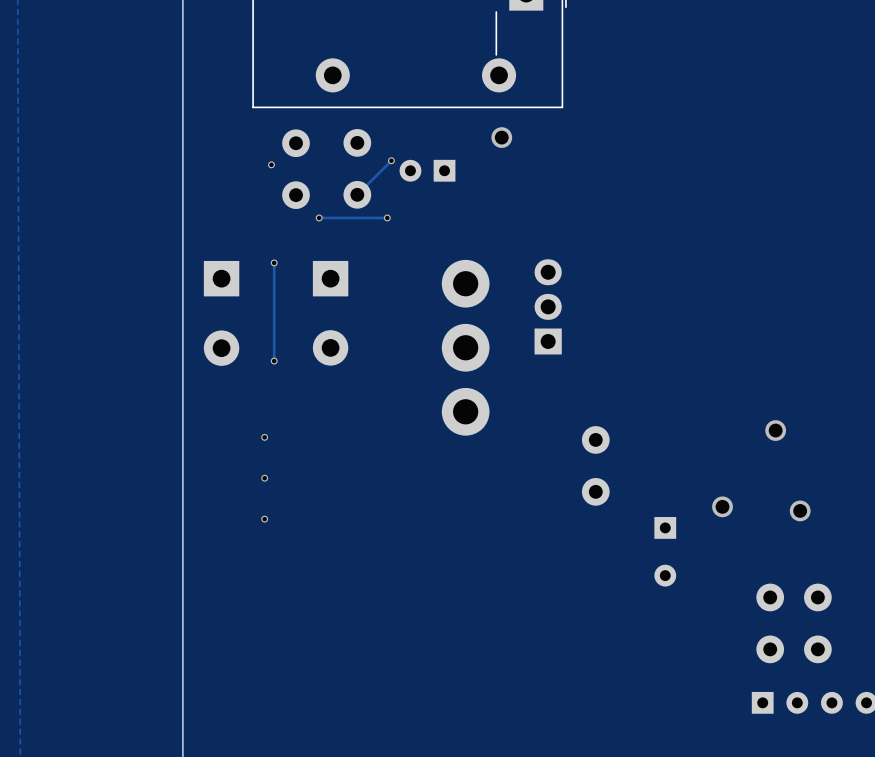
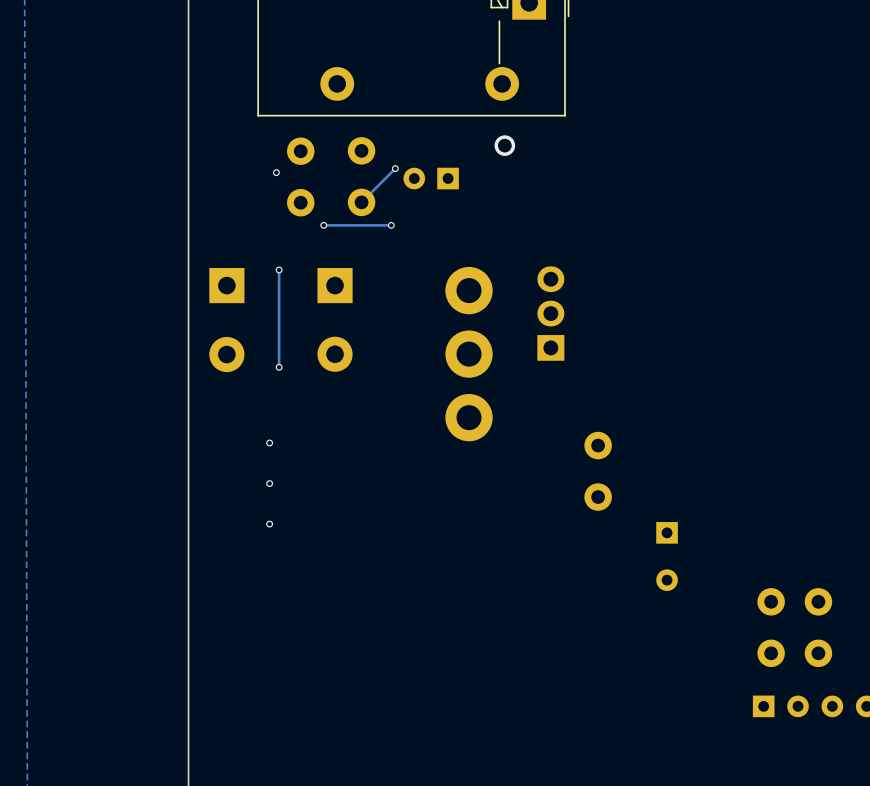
via: (775, 430) -> none
via: (722, 506) -> none
via: (800, 510) -> none

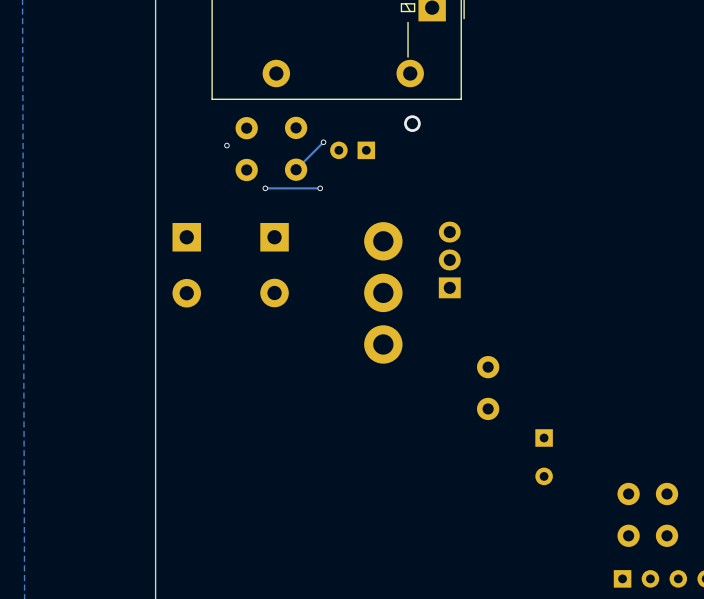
track: (279, 269) (279, 367) -> none
via: (279, 269) -> none
via: (279, 367) -> none
via: (269, 442) -> none
via: (269, 483) -> none
via: (269, 524) -> none

